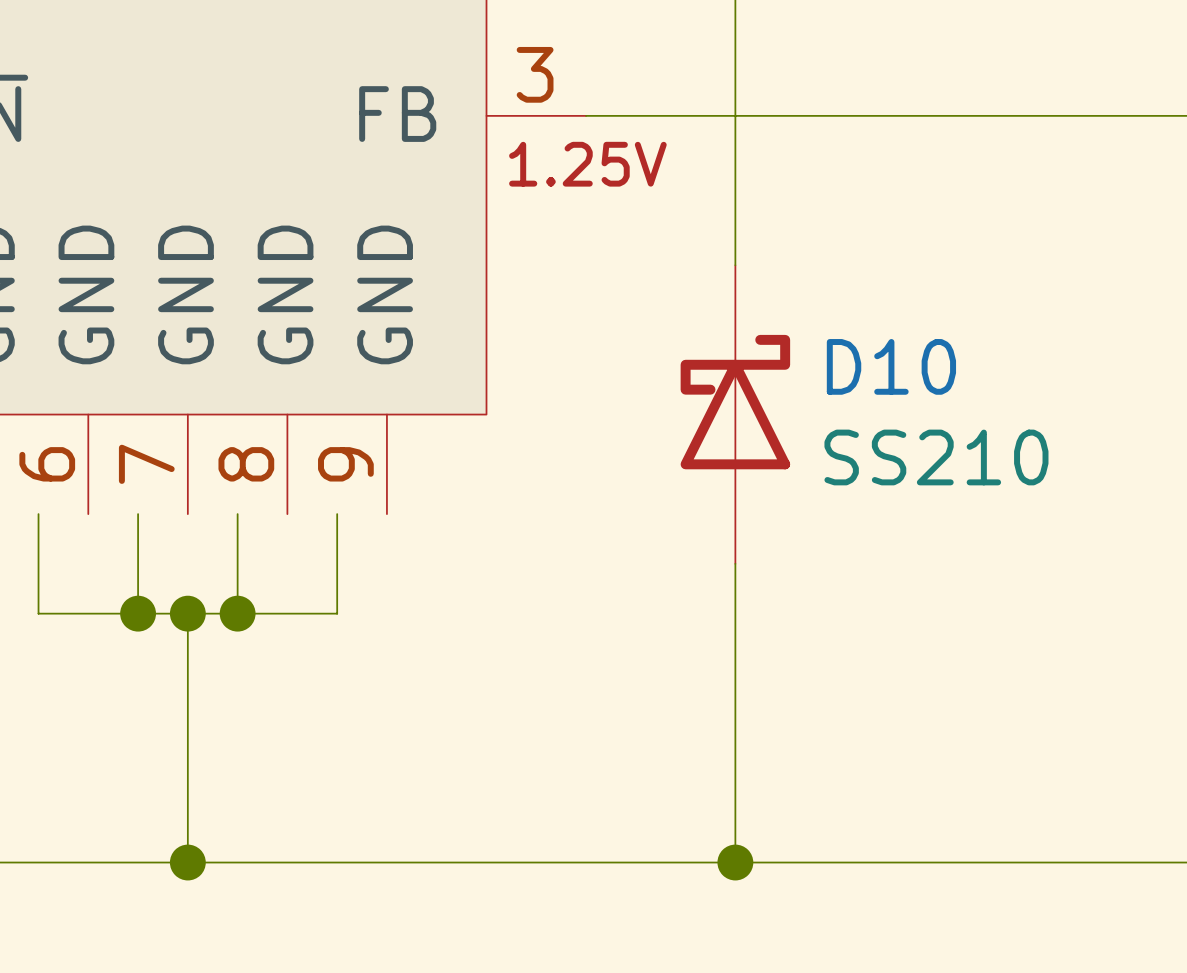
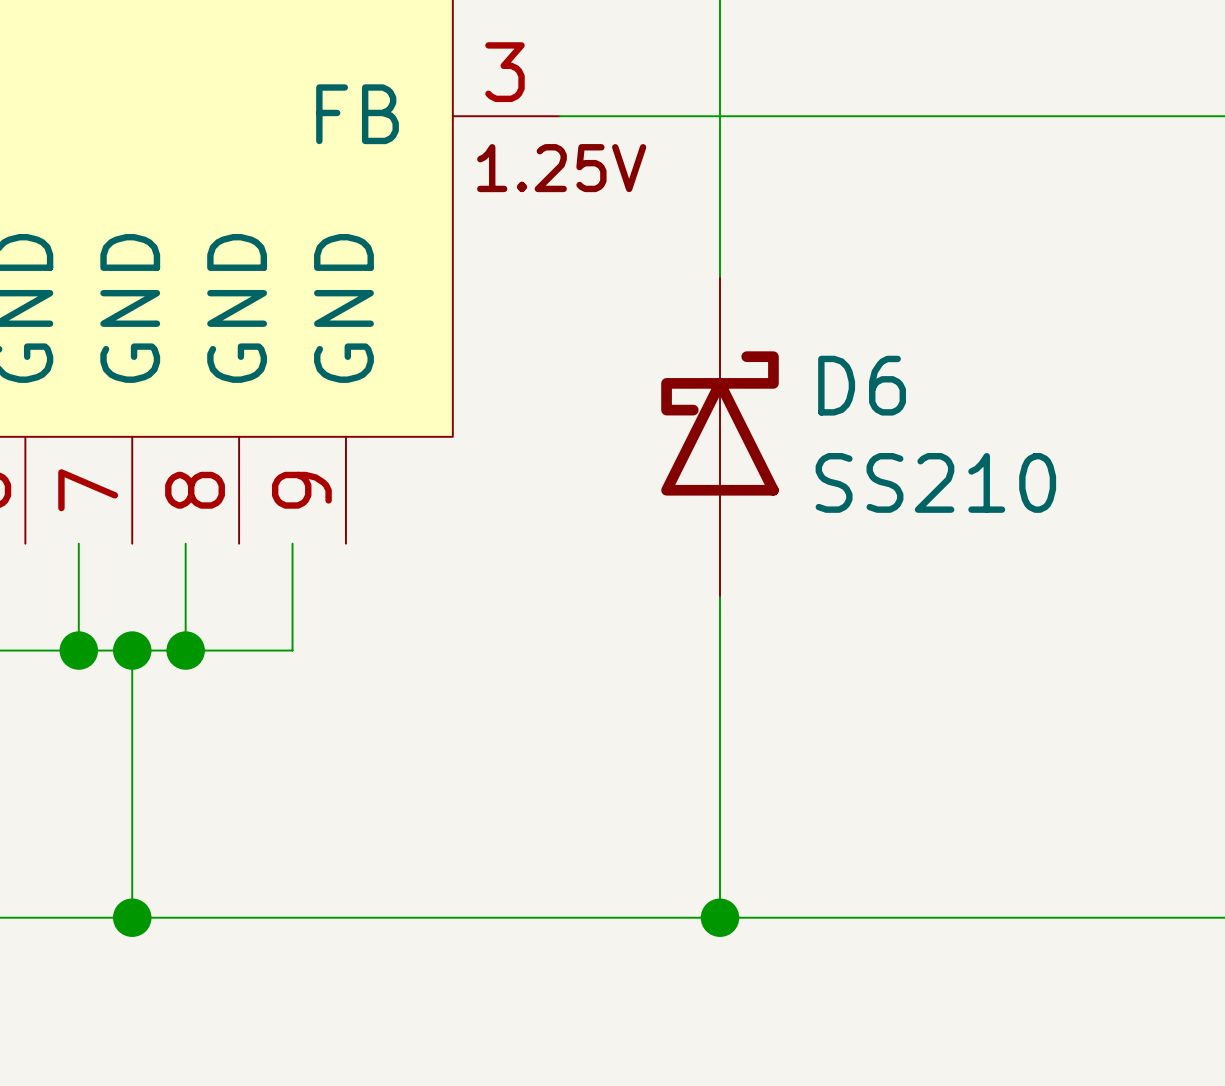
D10 name: D10 (891, 366) -> D6 (862, 385)

